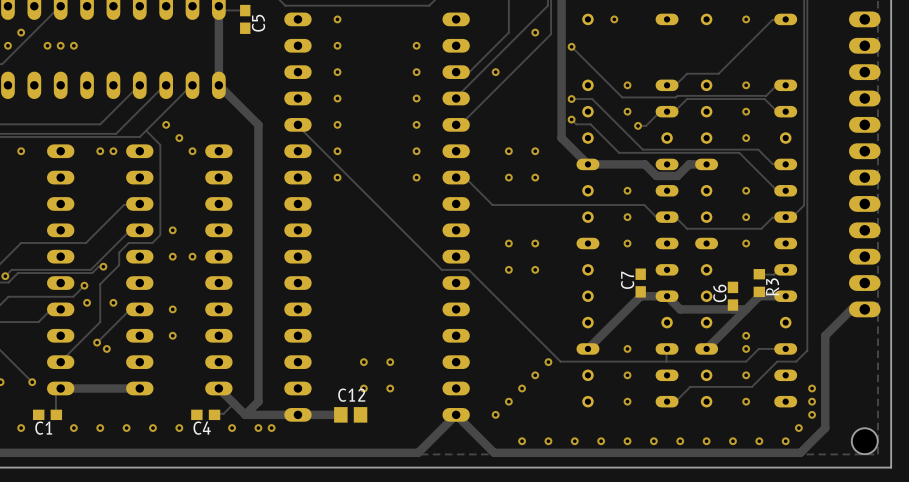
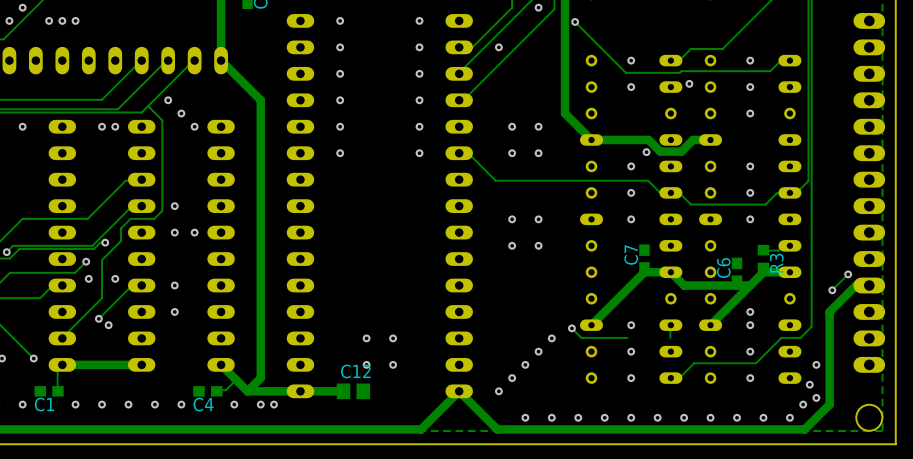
track: (571, 99) (592, 99) (642, 149) (758, 149) (772, 163) (785, 164) -> none
via: (571, 99) -> none
via: none -> (689, 83)
track: (785, 111) (777, 111) (764, 99) (687, 99) (674, 111) (660, 111) (645, 125) (638, 125) -> none
track: (571, 119) (576, 124) (590, 124) (619, 152) (739, 152) (777, 190) (785, 190) -> none
via: (571, 119) -> none
track: (297, 124) (441, 269) (468, 269) (560, 361) (577, 361) -> (571, 328) (581, 337)
via: (638, 125) -> none
via: none -> (646, 152)
track: none -> (848, 274) (832, 290)
via: none -> (848, 274)
via: none -> (832, 290)
track: (785, 348) (758, 348) (746, 361) (623, 361) -> none
via: none -> (571, 328)
part: none -> (869, 338)
via: (812, 401) -> none
via: none -> (809, 384)
via: (812, 414) -> none
via: none -> (816, 397)

